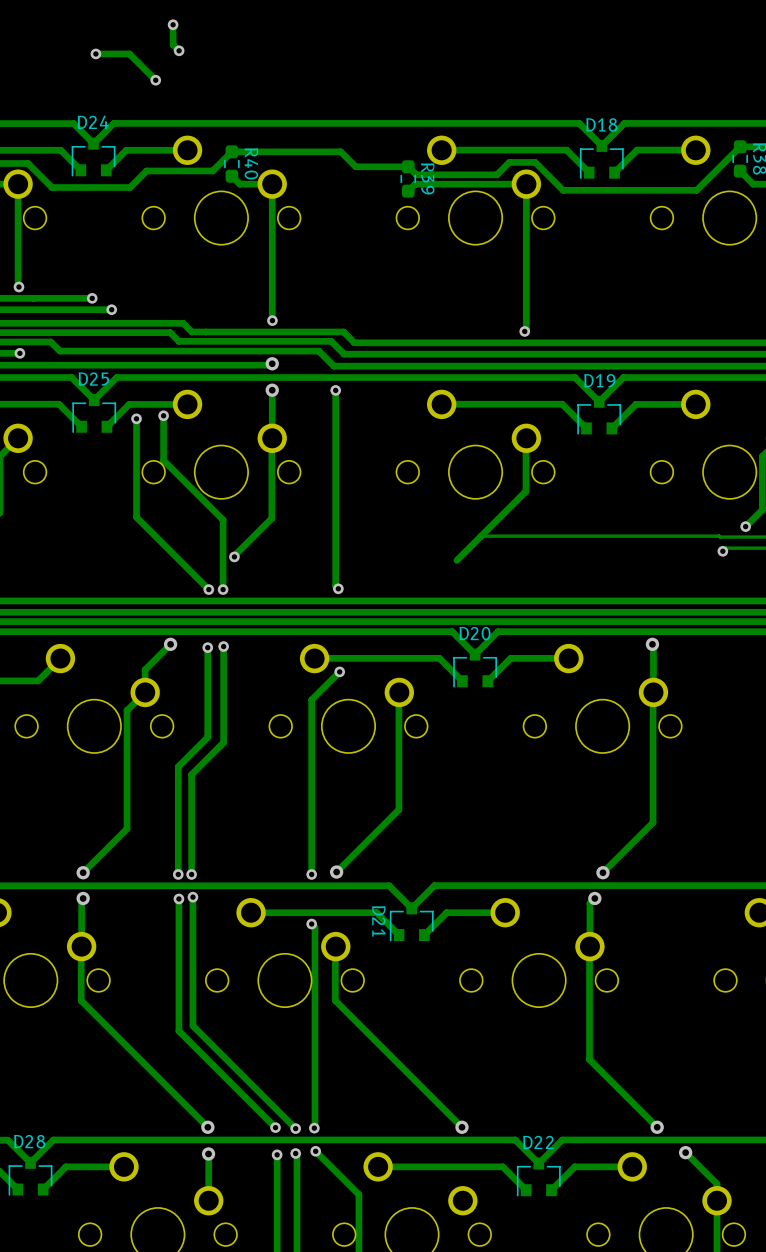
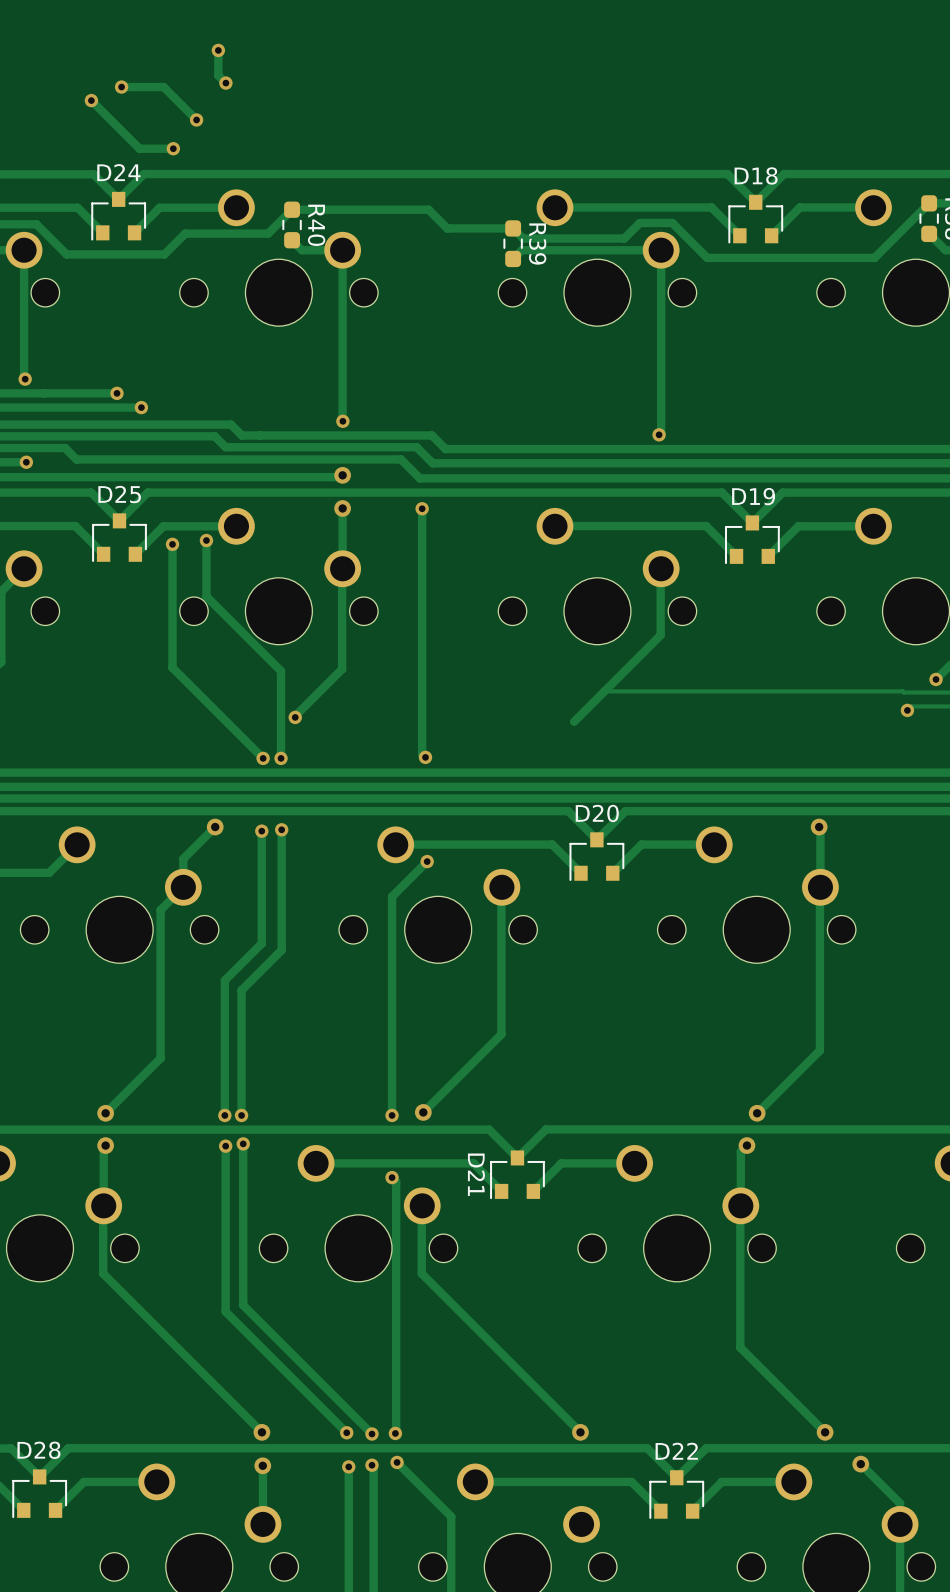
track: none -> (91, 100) (139, 148) (173, 148)
via: none -> (91, 100)
via: none -> (173, 148)

